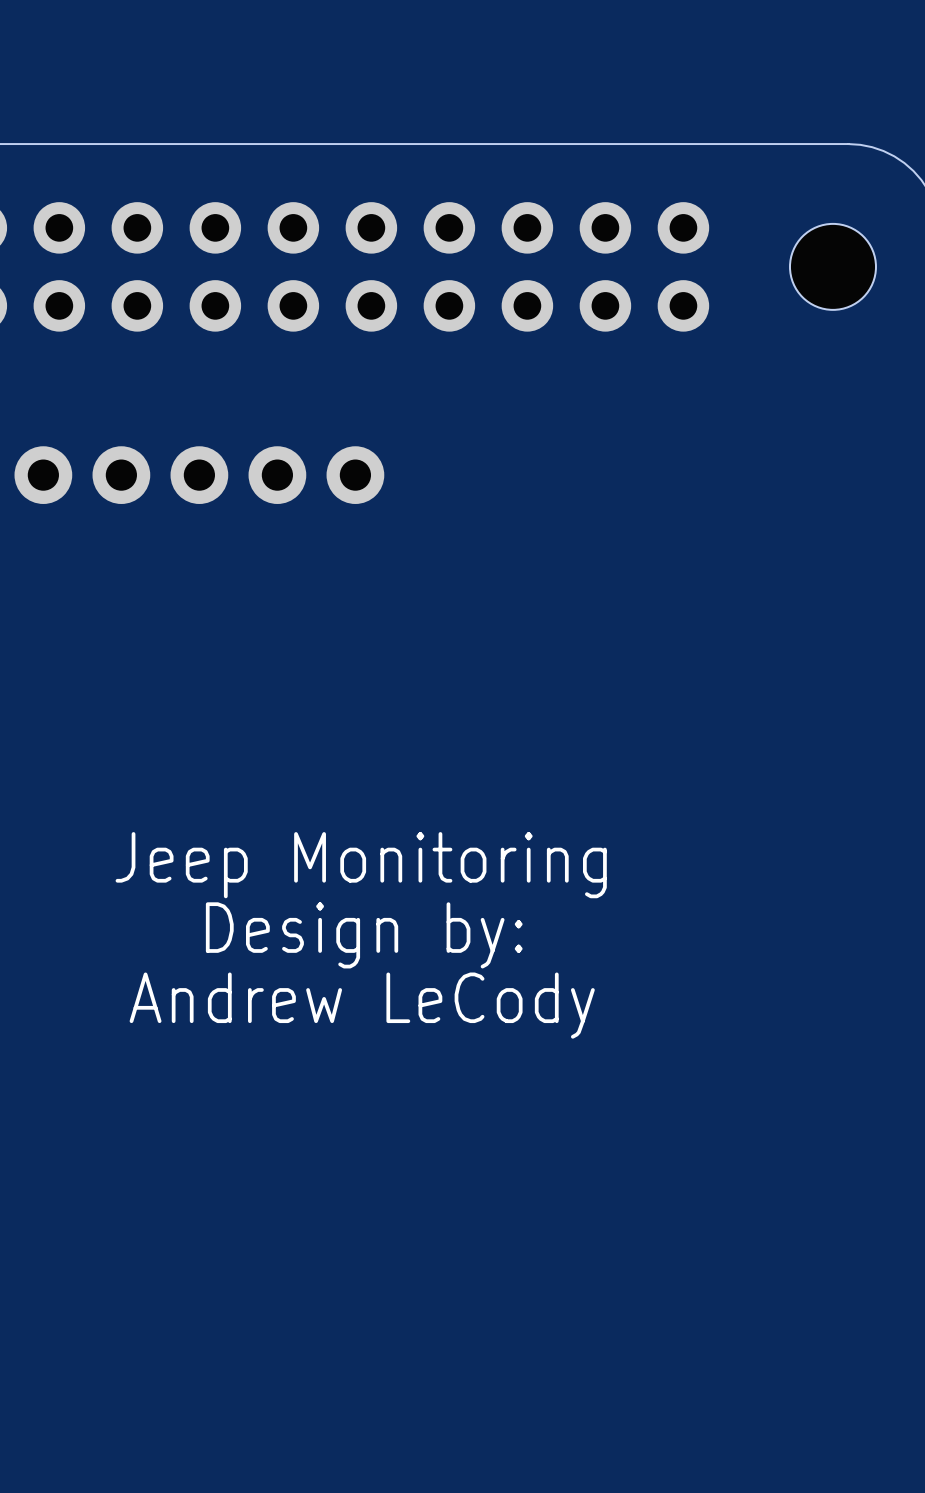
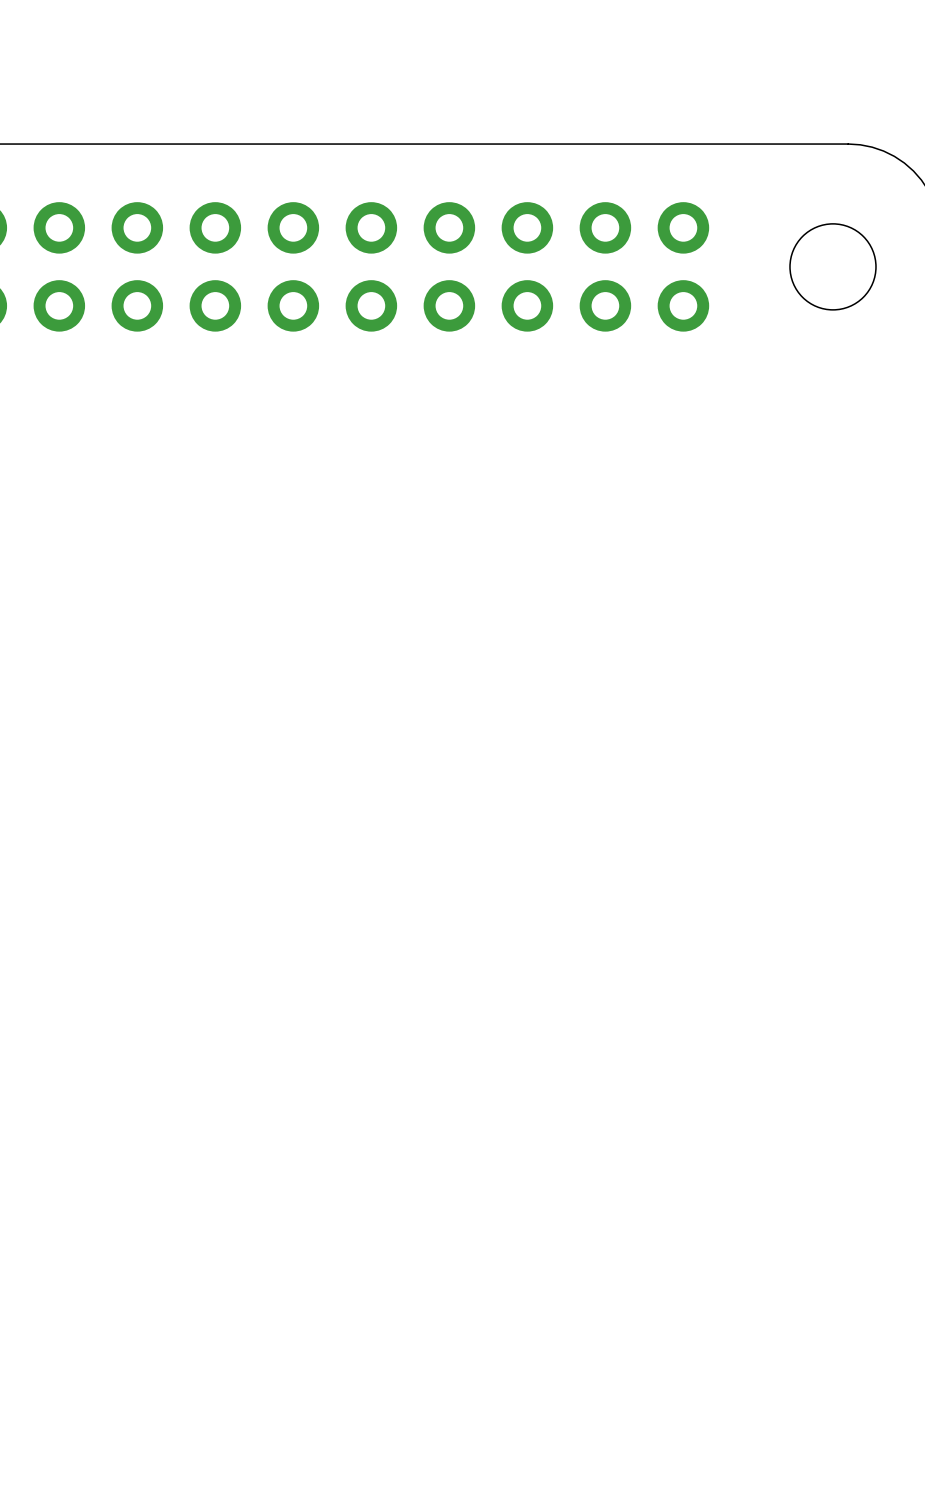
part: (199, 475) -> none
text: Jeep Monitoring (361, 865) -> none
text: Design by: (364, 935) -> none
text: Andrew LeCody (362, 1005) -> none

